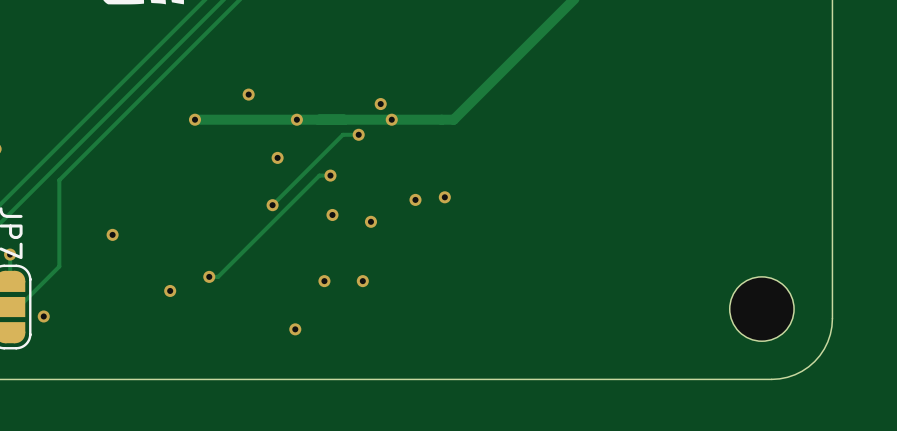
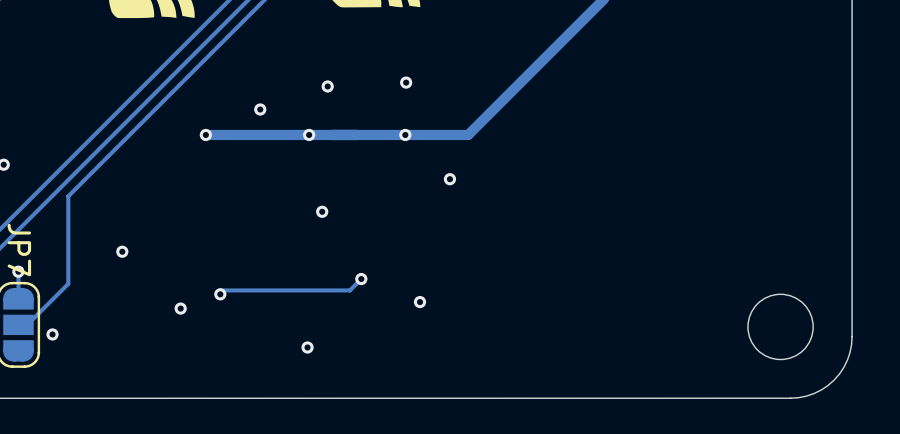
via: none -> (406, 82)
via: none -> (327, 86)
via: (380, 104) -> none
track: (358, 134) (342, 134) (272, 205) -> none
via: (358, 134) -> none
via: (277, 157) -> none
via: none -> (449, 179)
track: (330, 175) (319, 175) (218, 276) (209, 276) -> none
via: (330, 175) -> none
via: none -> (322, 211)
via: (444, 197) -> none
via: (415, 199) -> none
via: (272, 205) -> none
via: (332, 214) -> none
via: (370, 221) -> none
track: none -> (361, 279) (349, 290) (219, 290)
via: none -> (361, 279)
via: (324, 281) -> none
via: (362, 281) -> none
via: none -> (420, 302)

